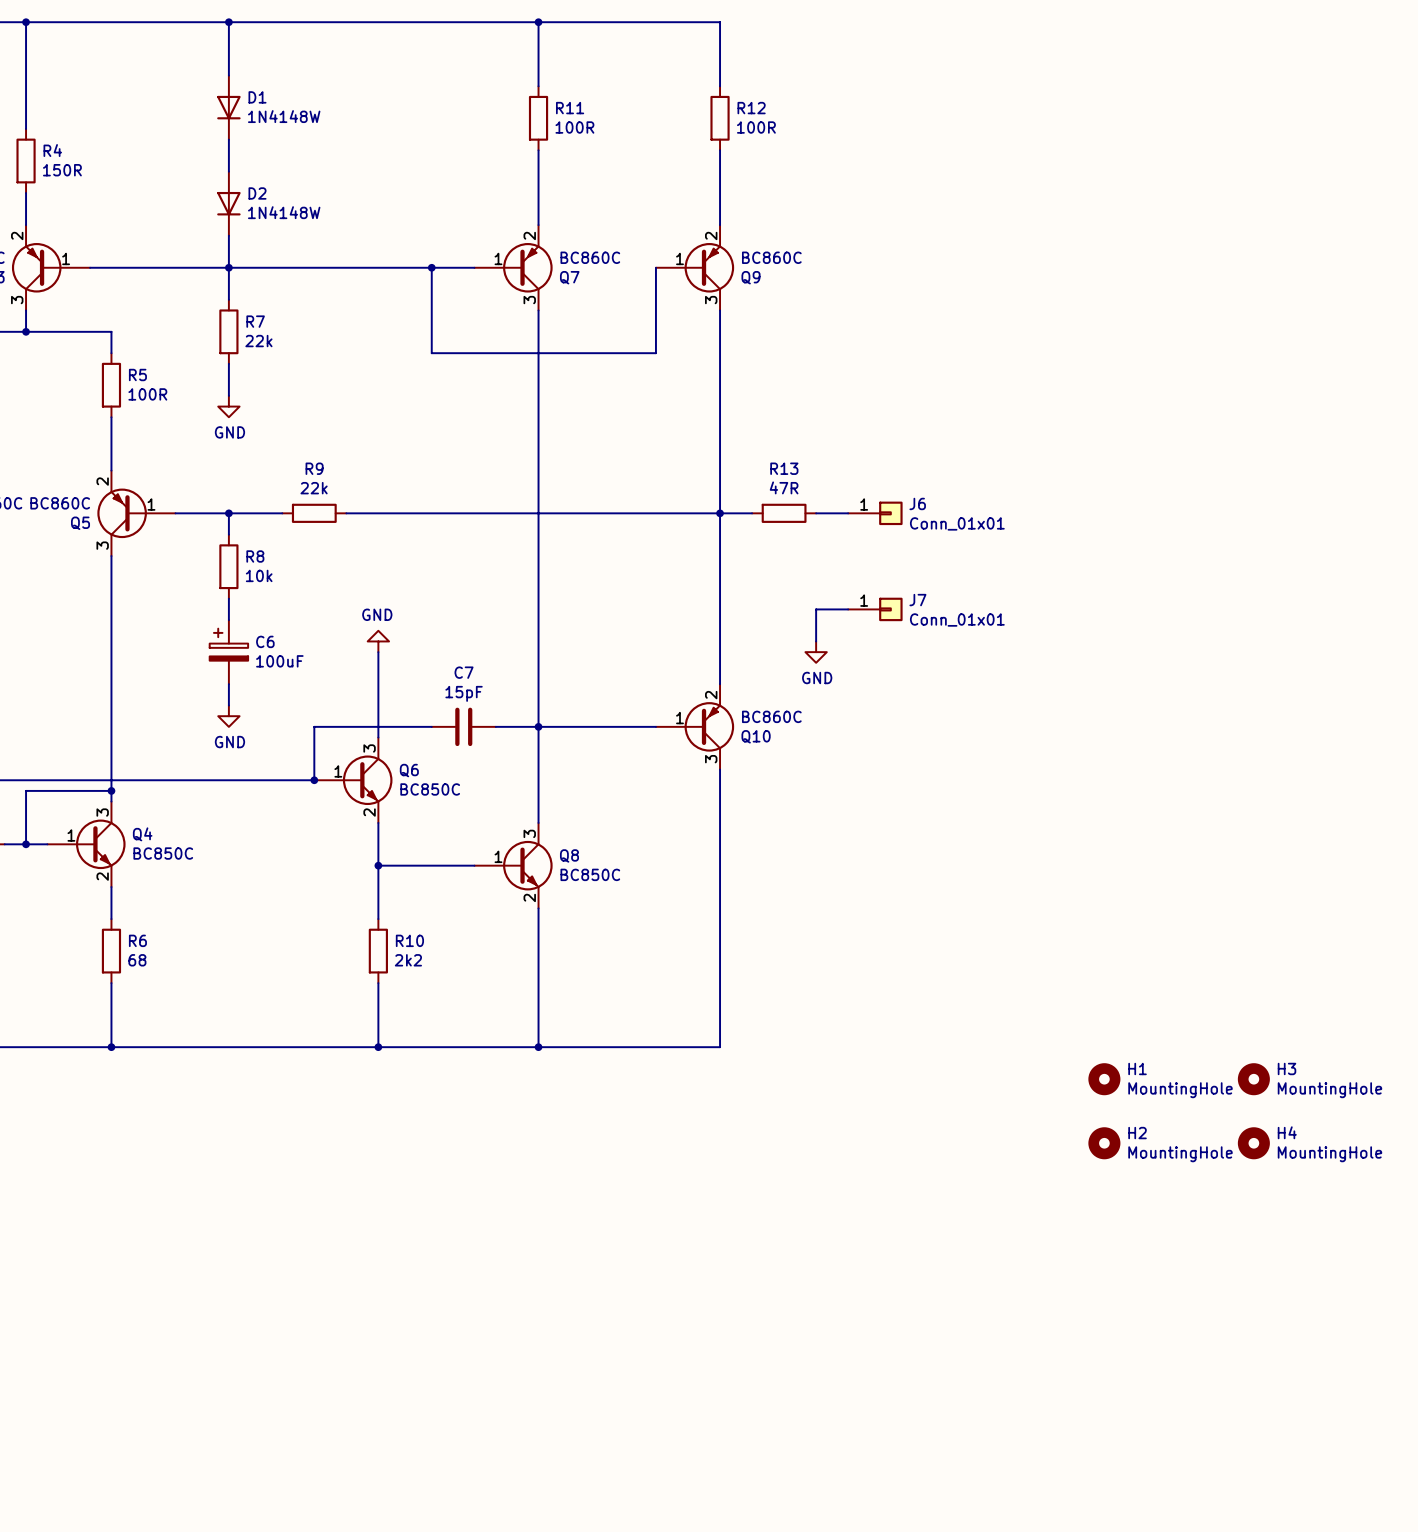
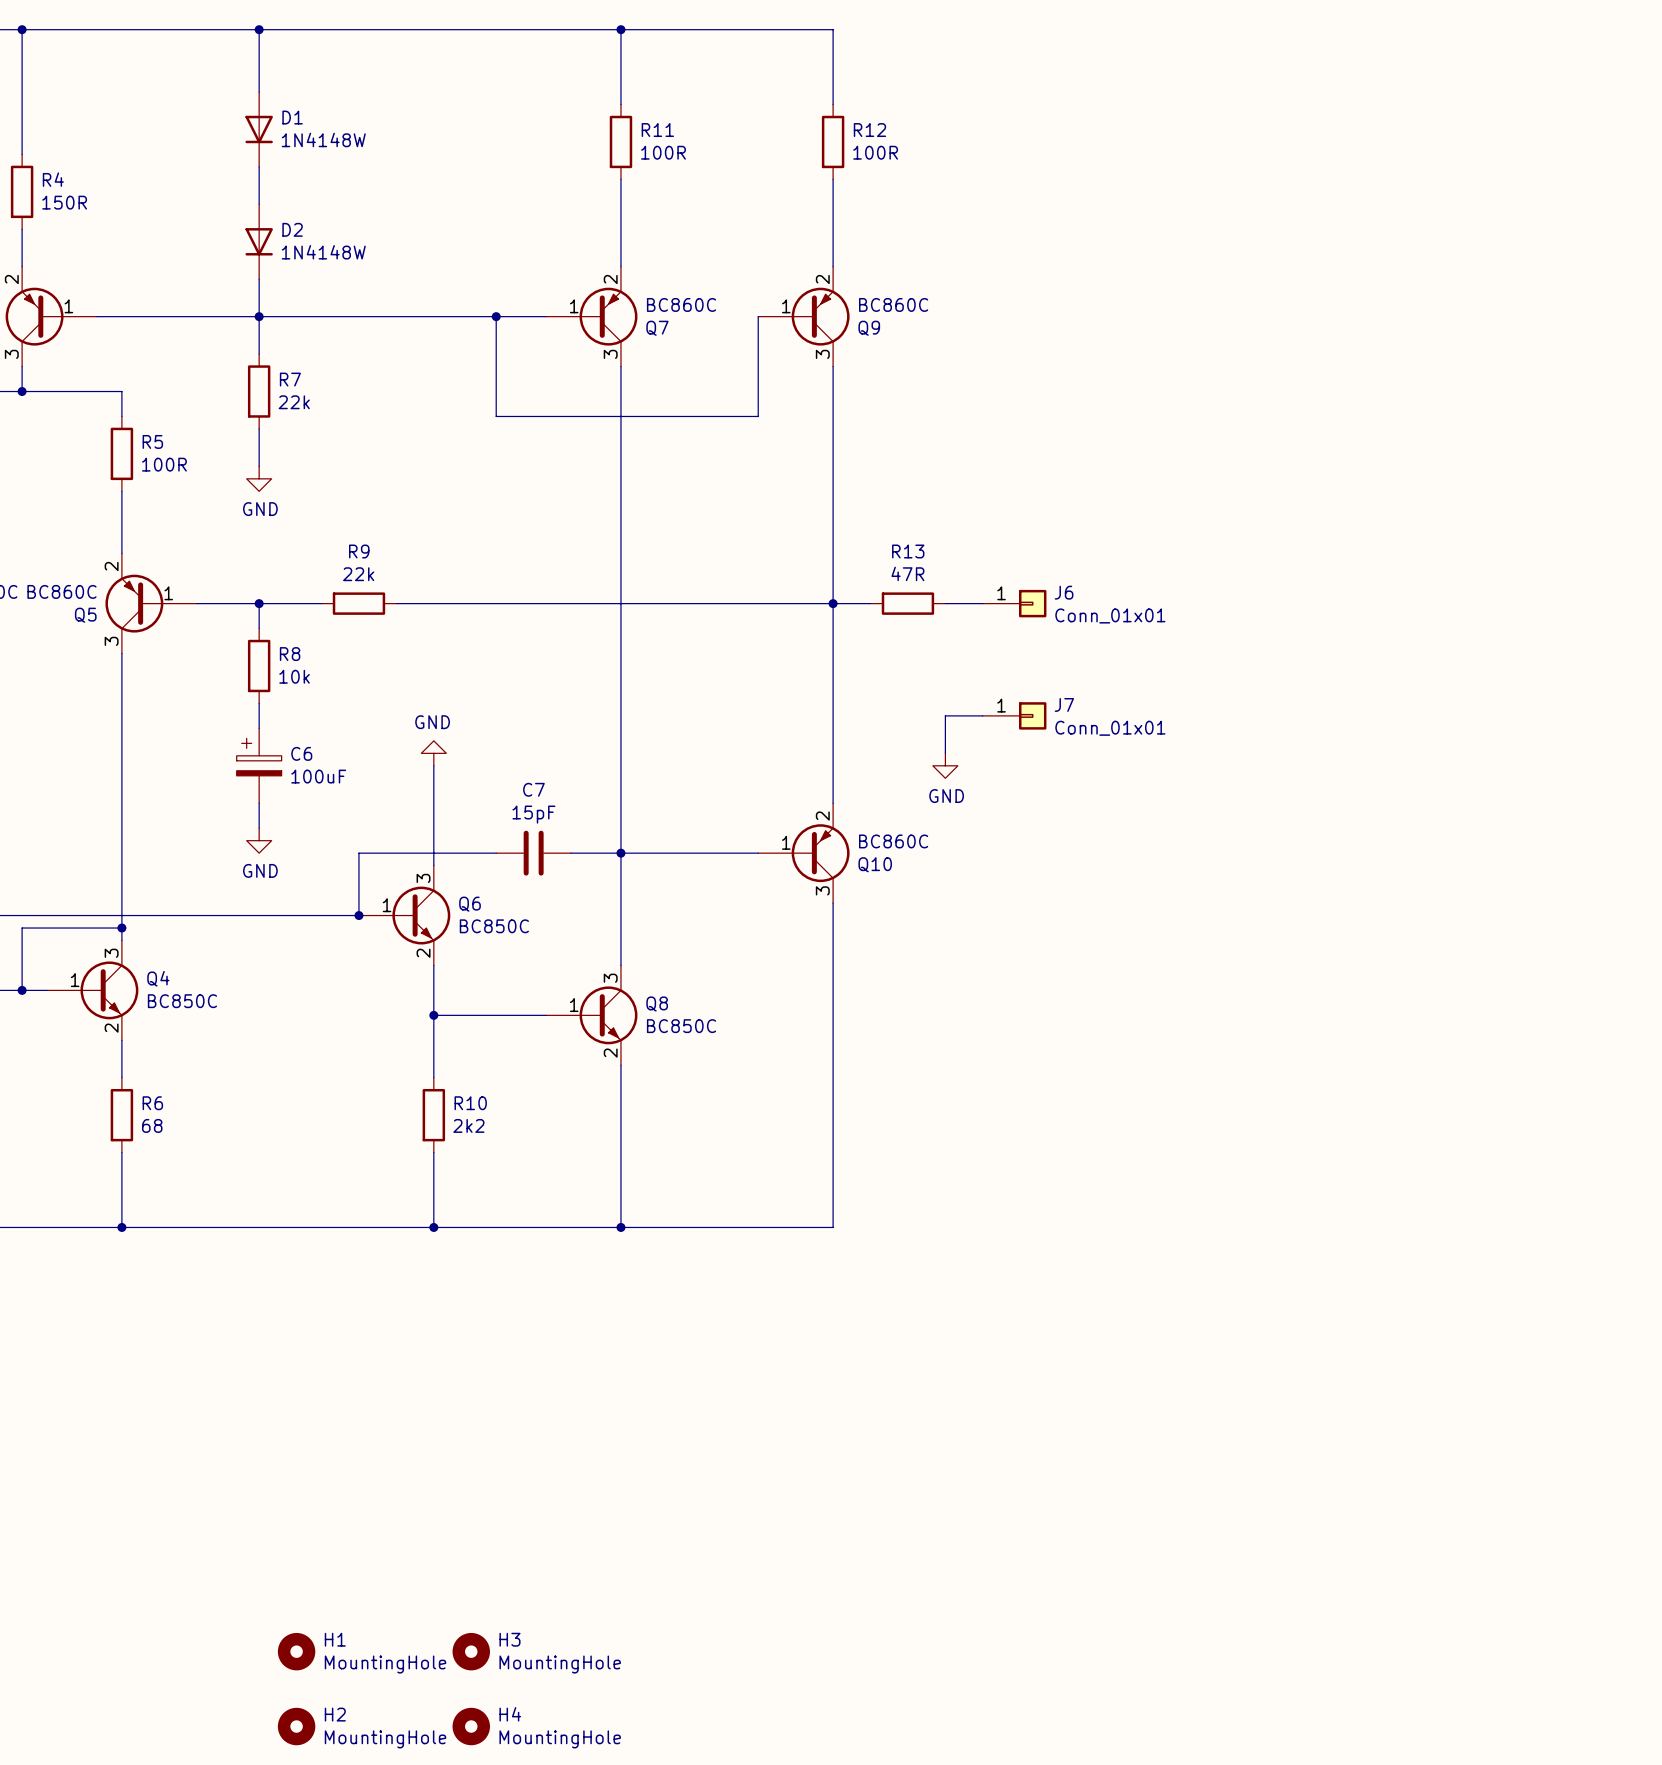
H1 position: (1104, 1079) -> (296, 1651)
H3 position: (1253, 1079) -> (471, 1651)
H2 position: (1104, 1143) -> (296, 1726)
H4 position: (1253, 1143) -> (471, 1726)

